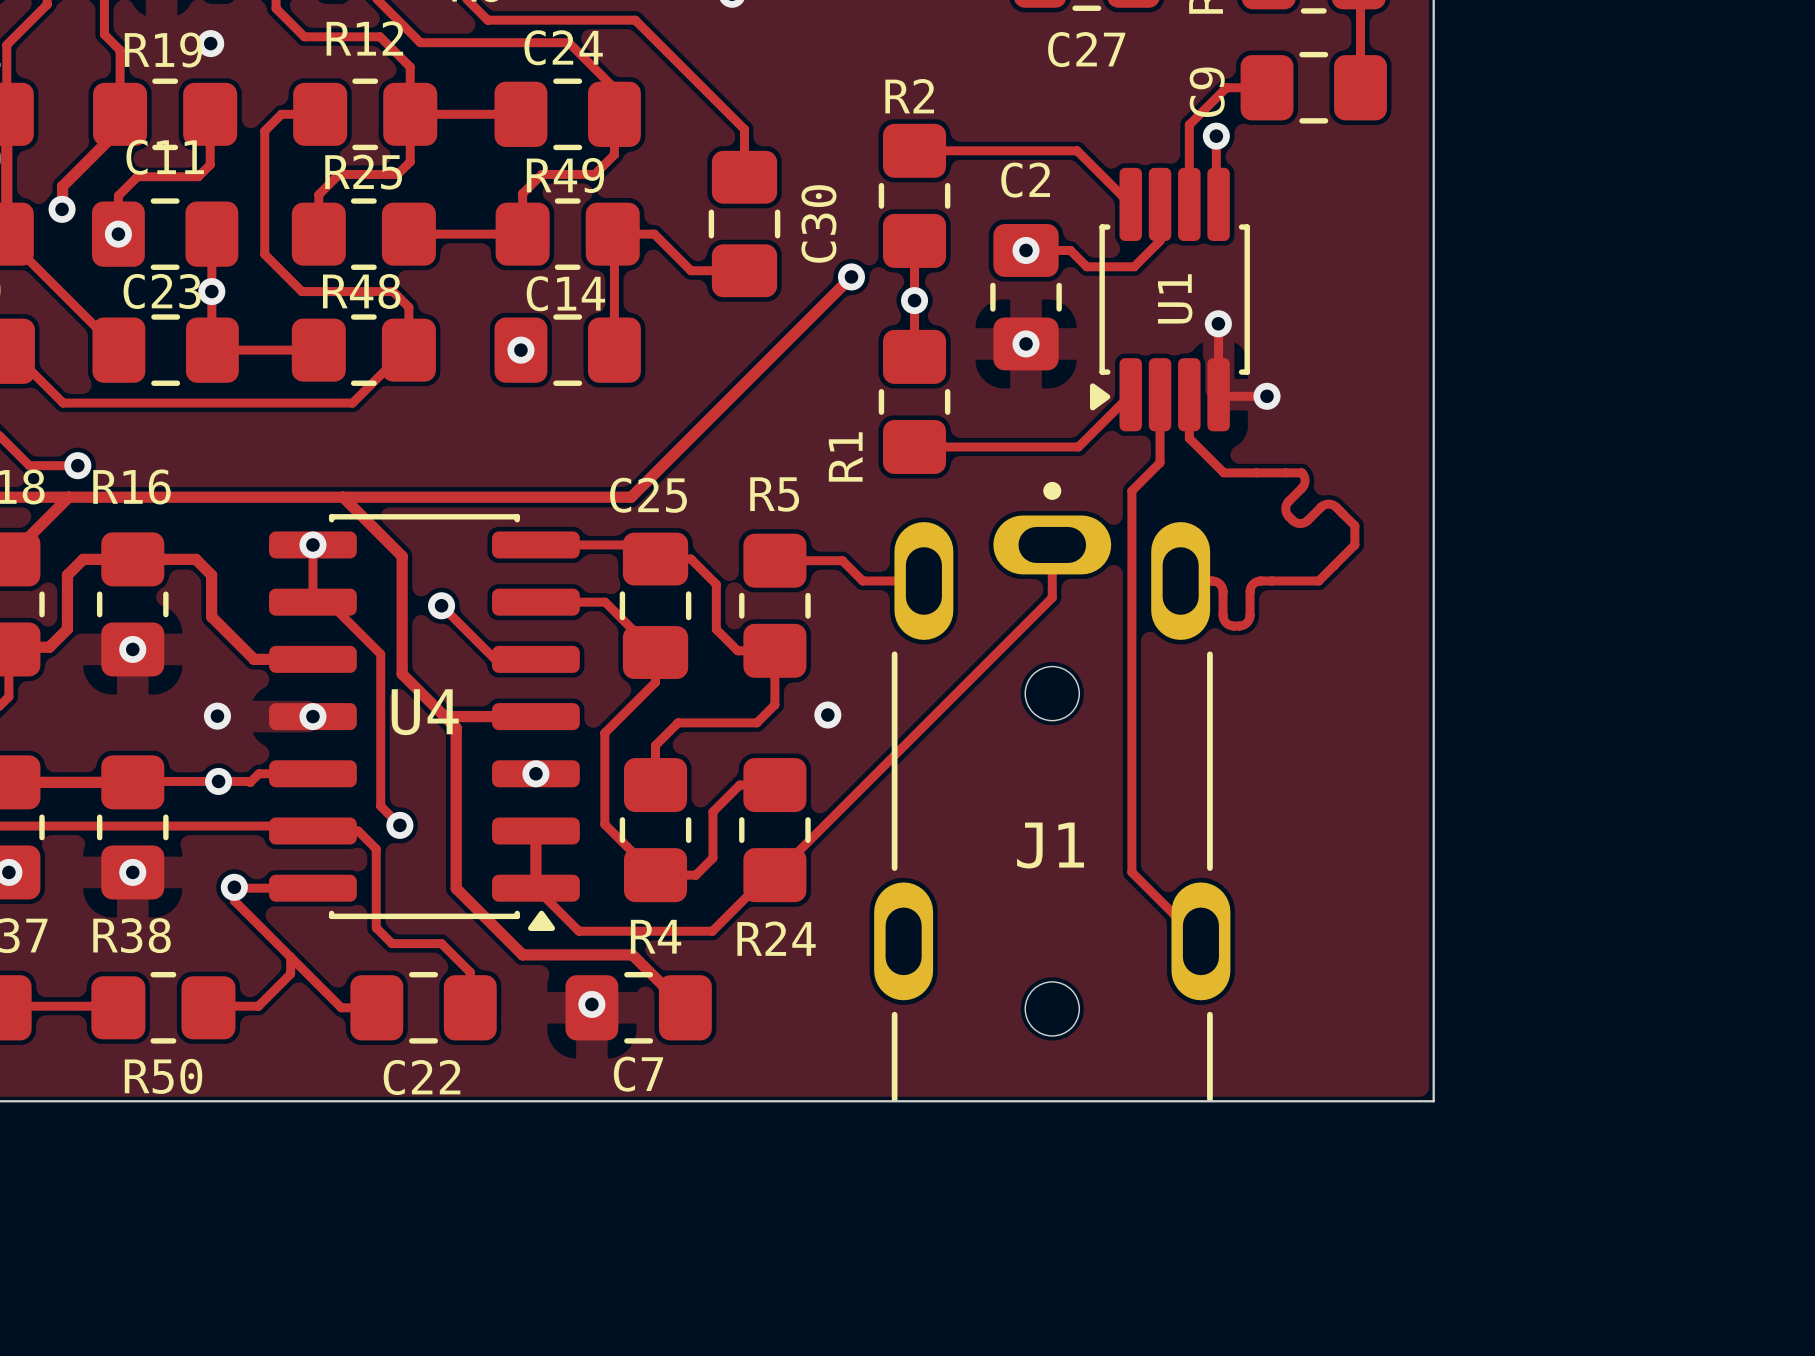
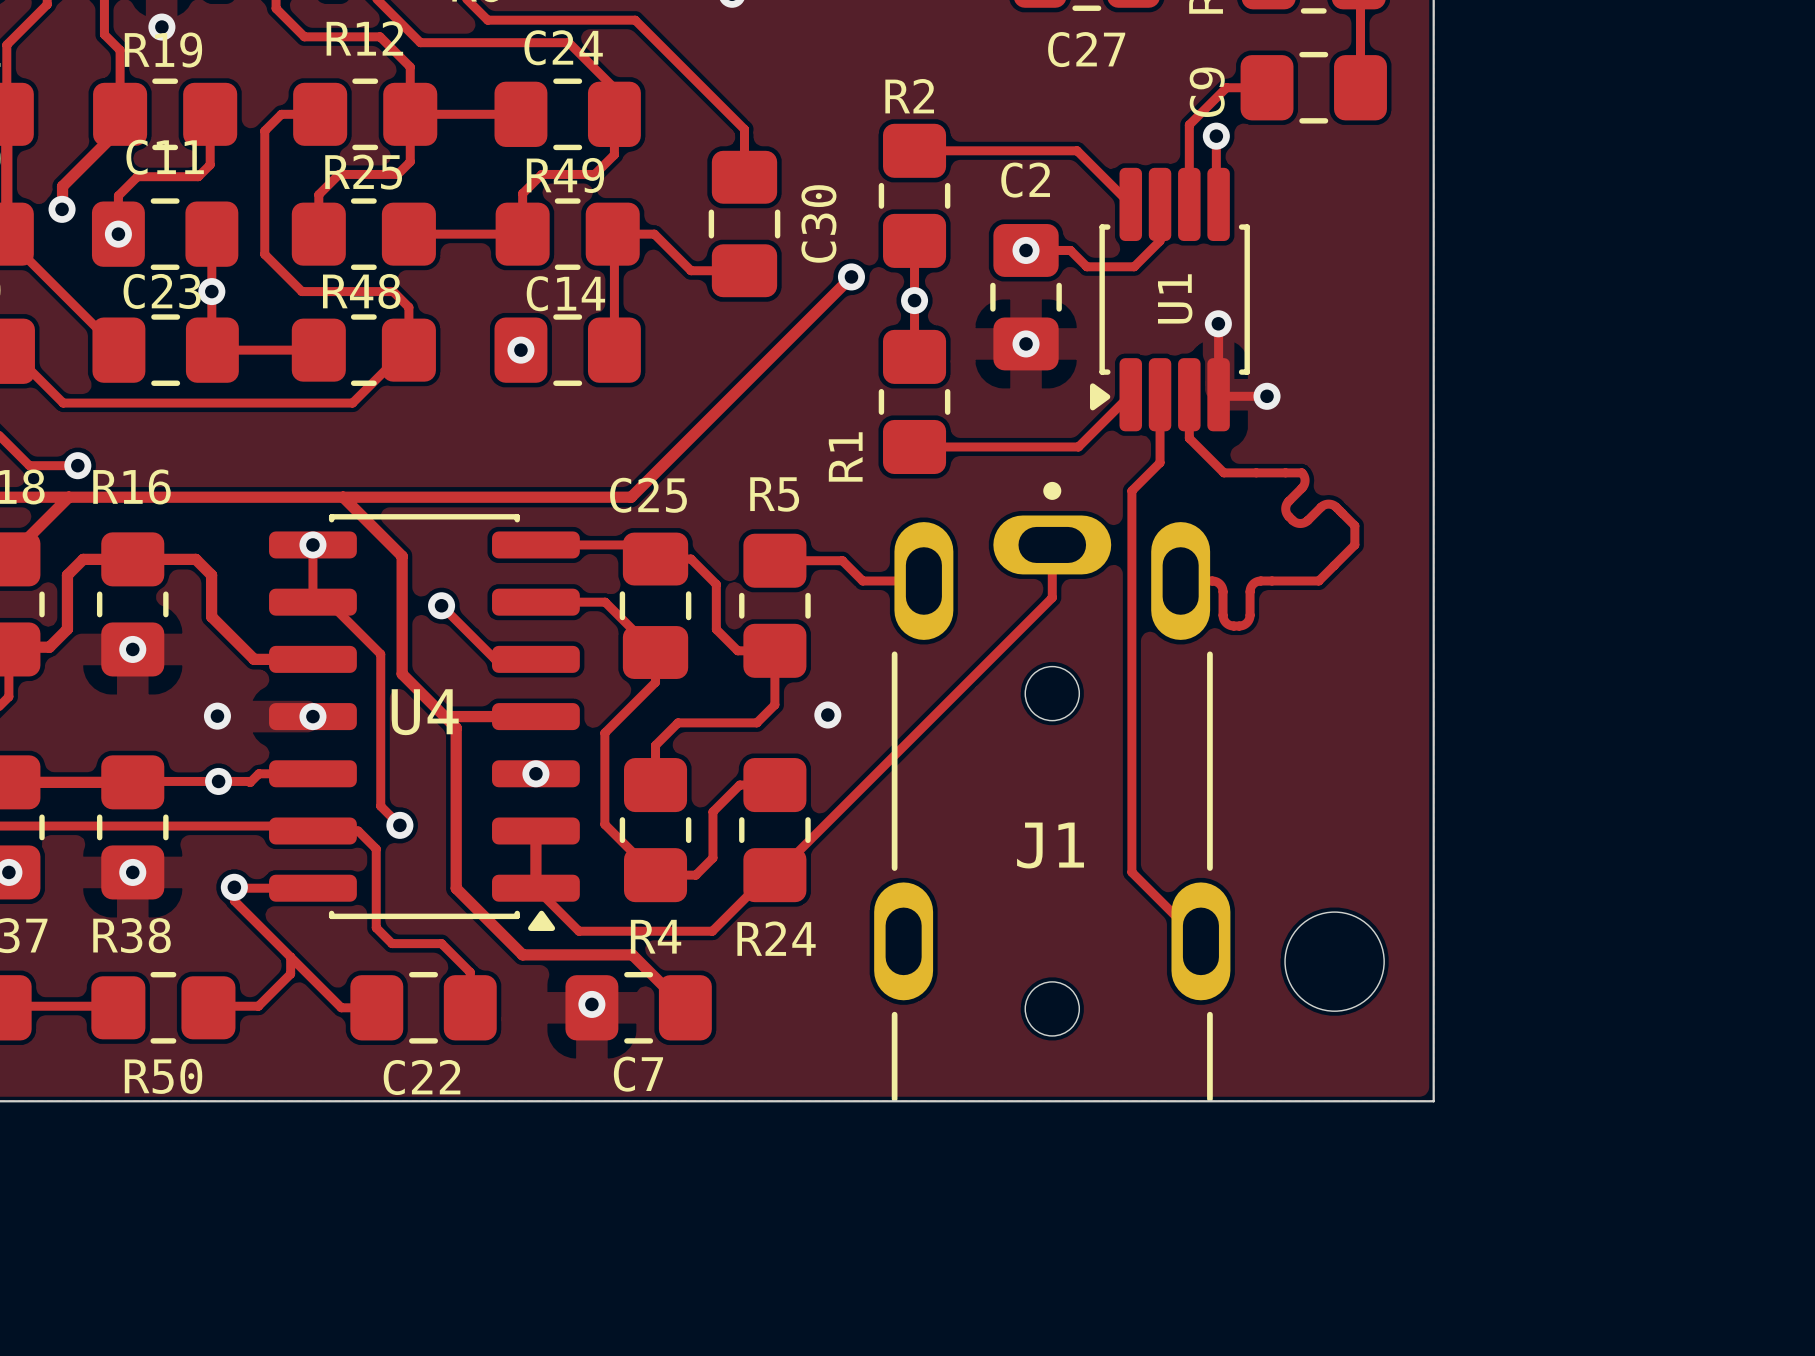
via: none -> (161, 27)
via: (210, 43) -> none
round board edge: none -> [1284, 911, 1385, 1012]

